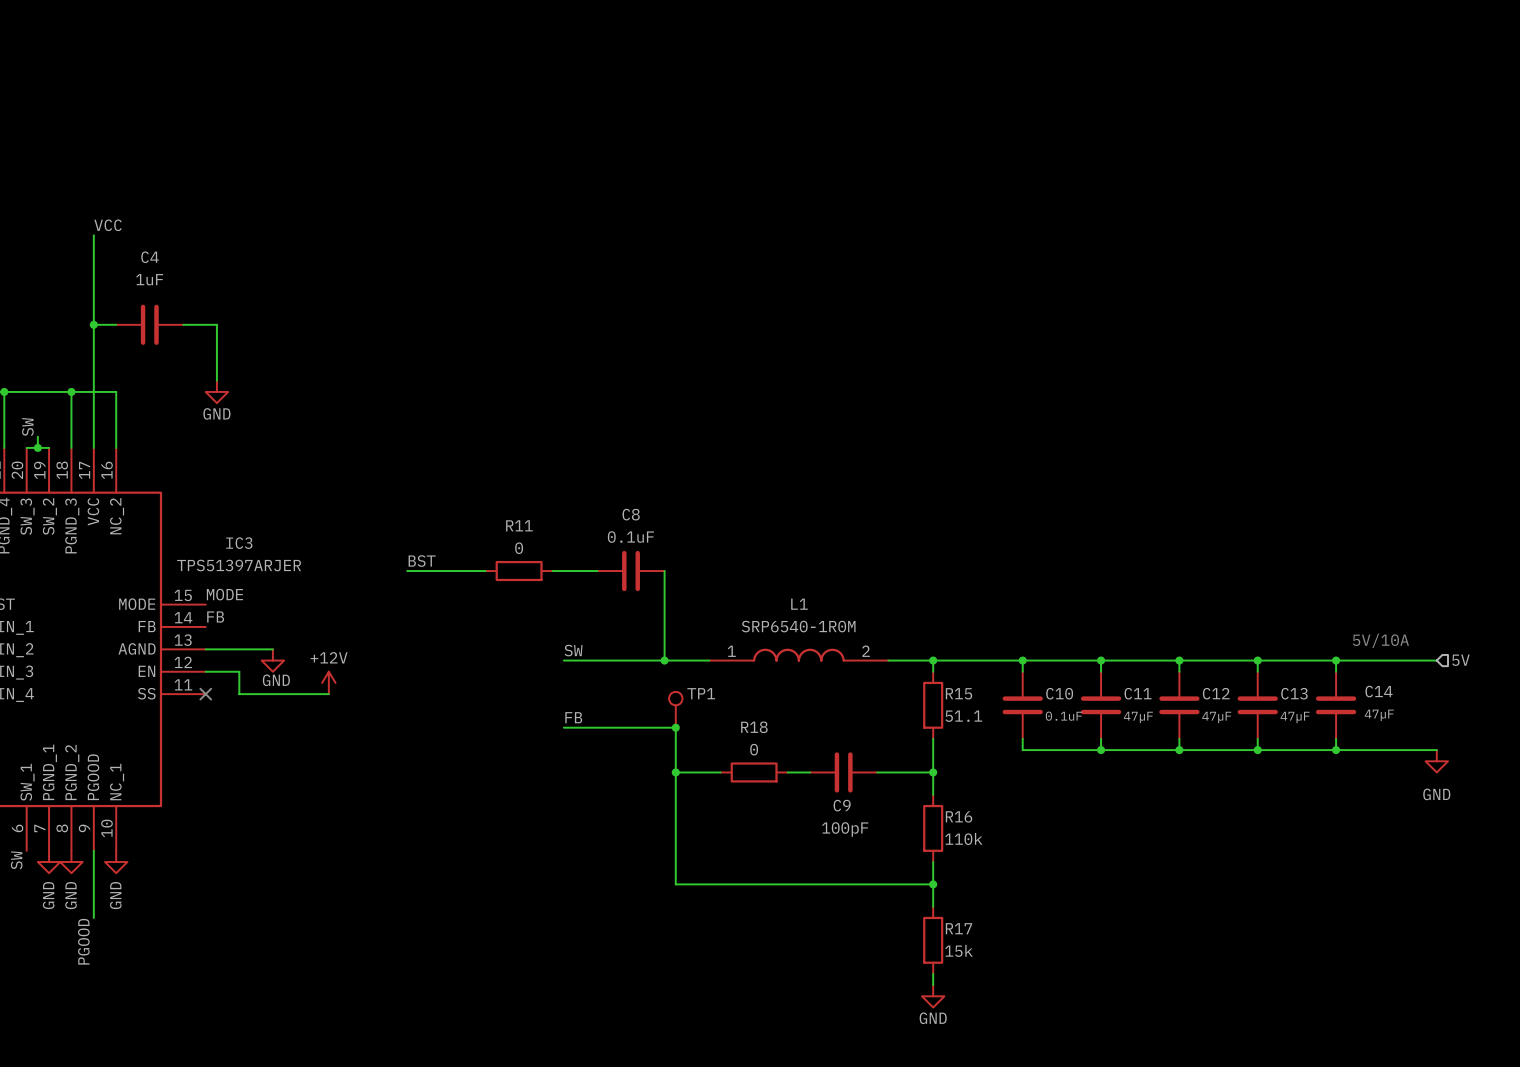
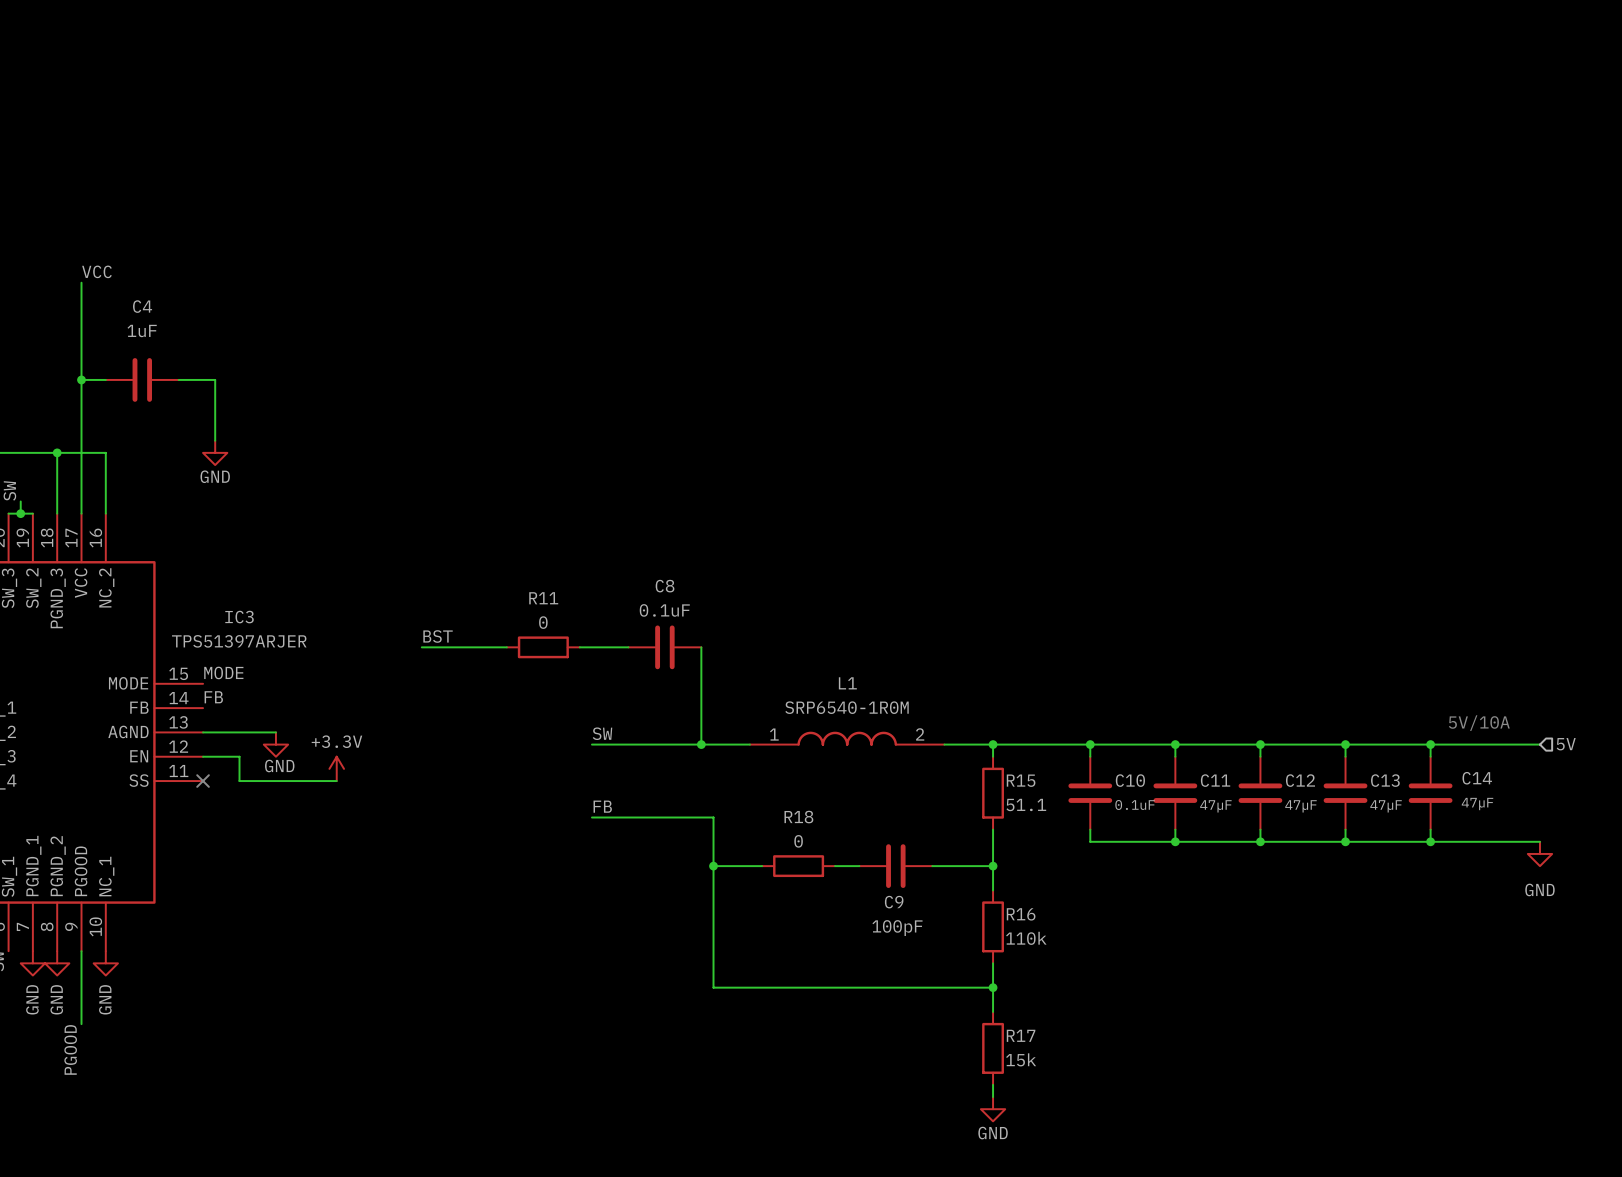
power symbol: +12V (328, 682) -> +3.3V (336, 768)
TP1: (675, 709) -> none
junction: (675, 727) -> none

